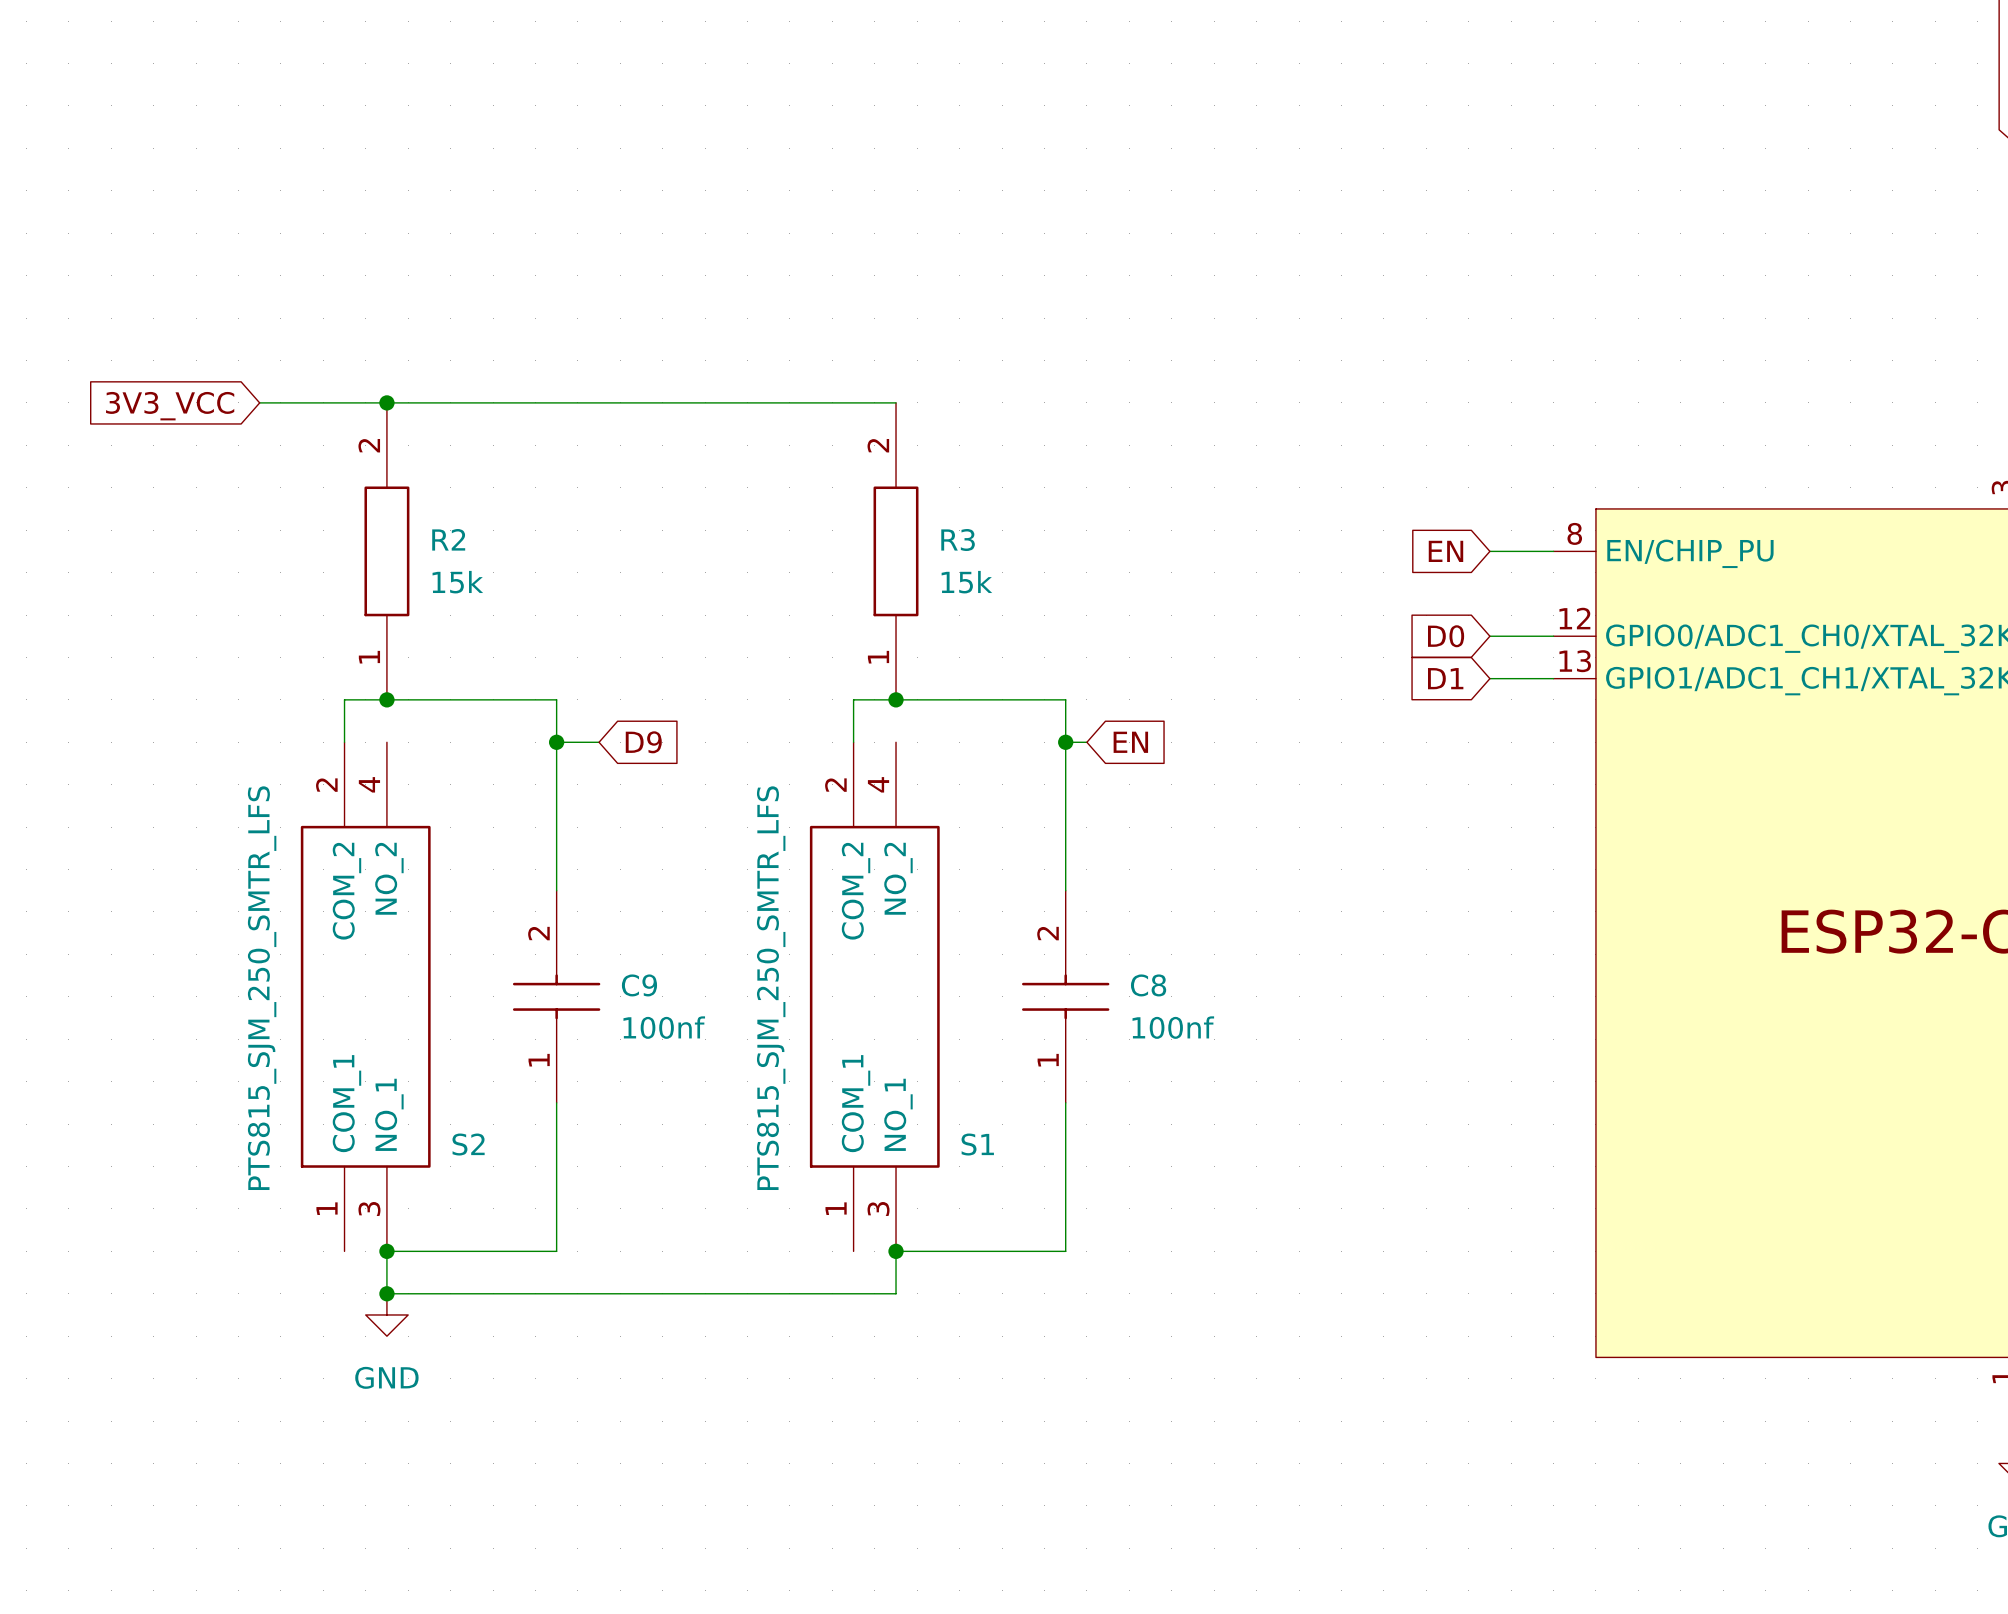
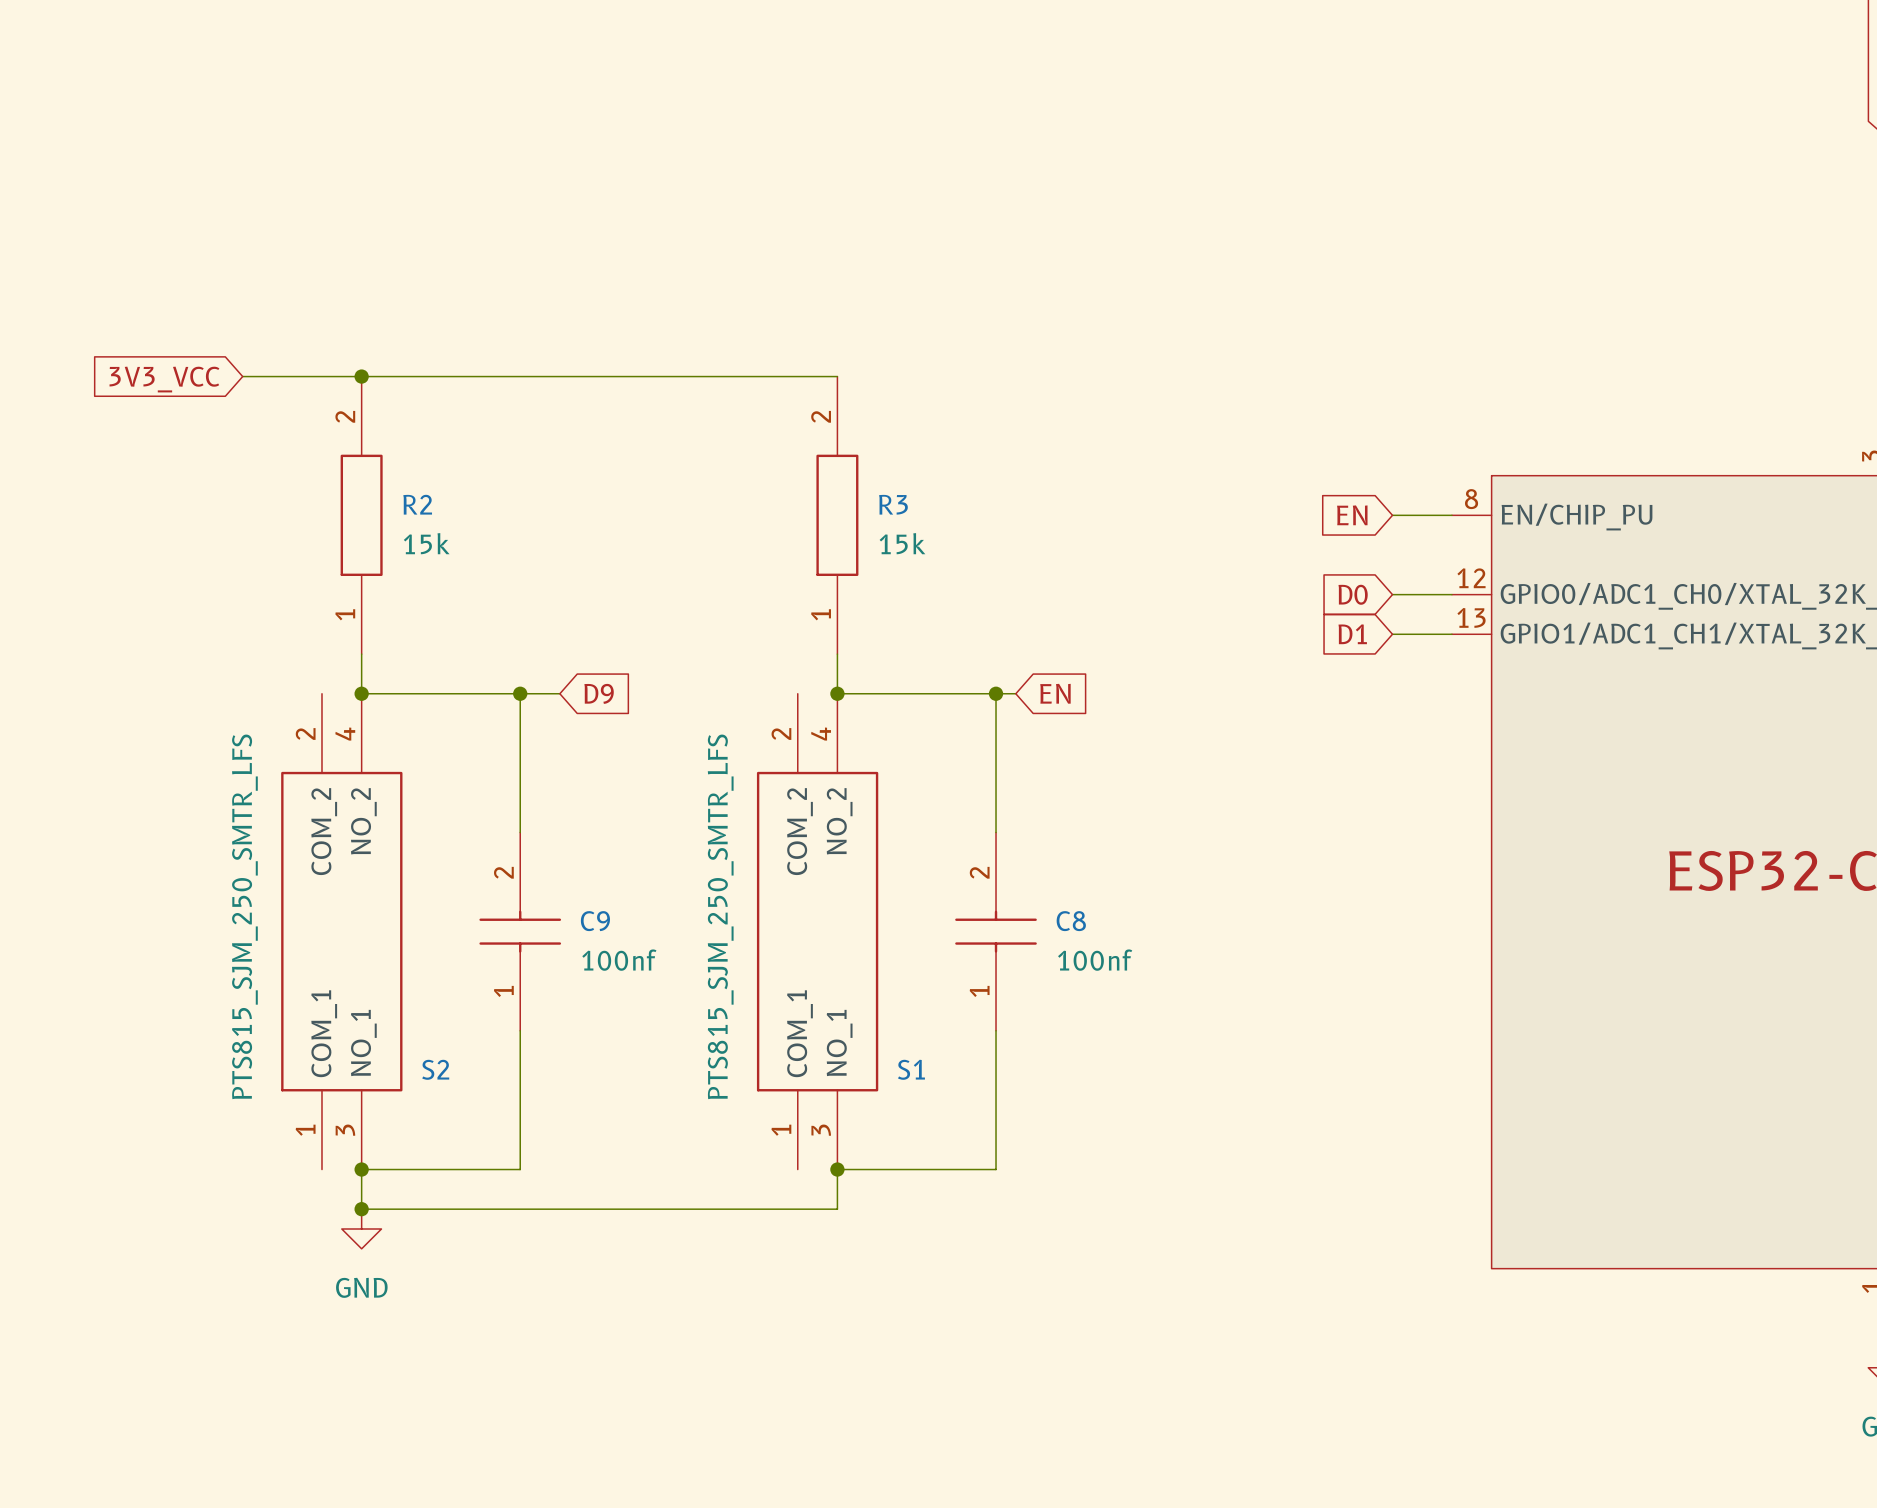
junction position: (386, 699) -> (361, 693)
junction position: (896, 699) -> (837, 693)
wire: (344, 742) (344, 699) (556, 699) (556, 742) -> (361, 654) (361, 693) (520, 693)
wire: (853, 742) (853, 699) (1065, 699) (1065, 742) -> (837, 654) (837, 693) (996, 693)

